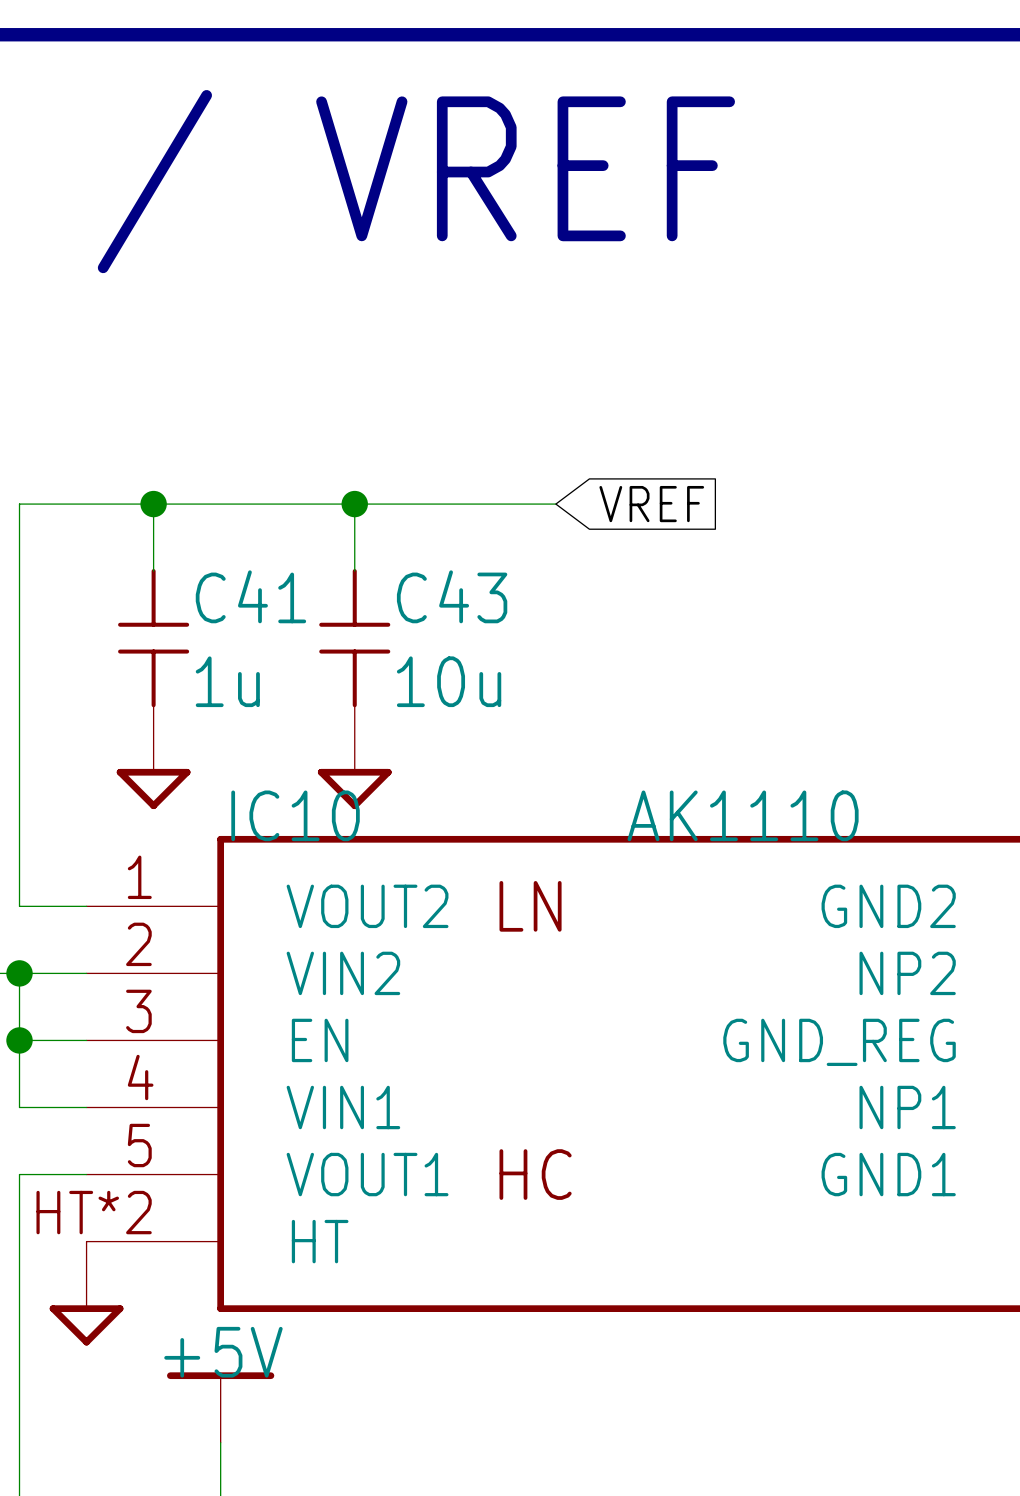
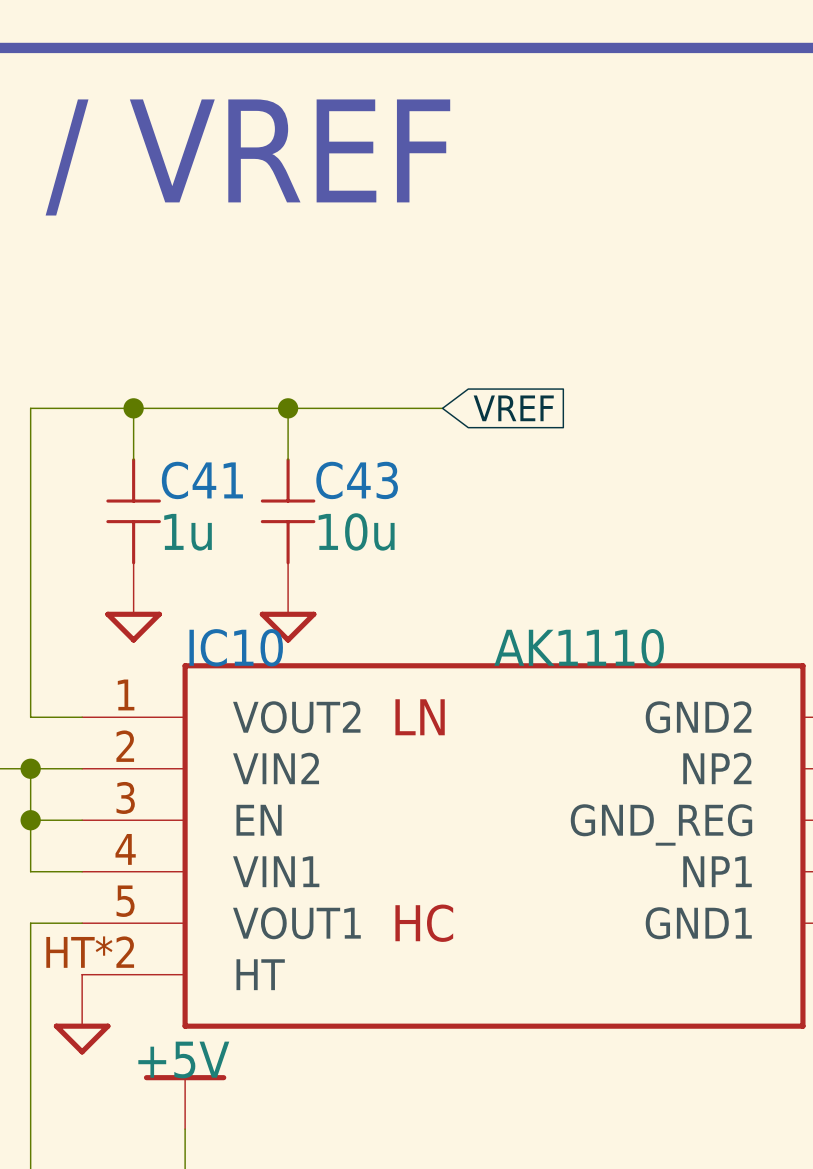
C41 value position: 1u (227, 681) -> 1u (188, 532)
C43 value position: 10u (449, 681) -> 10u (356, 531)

